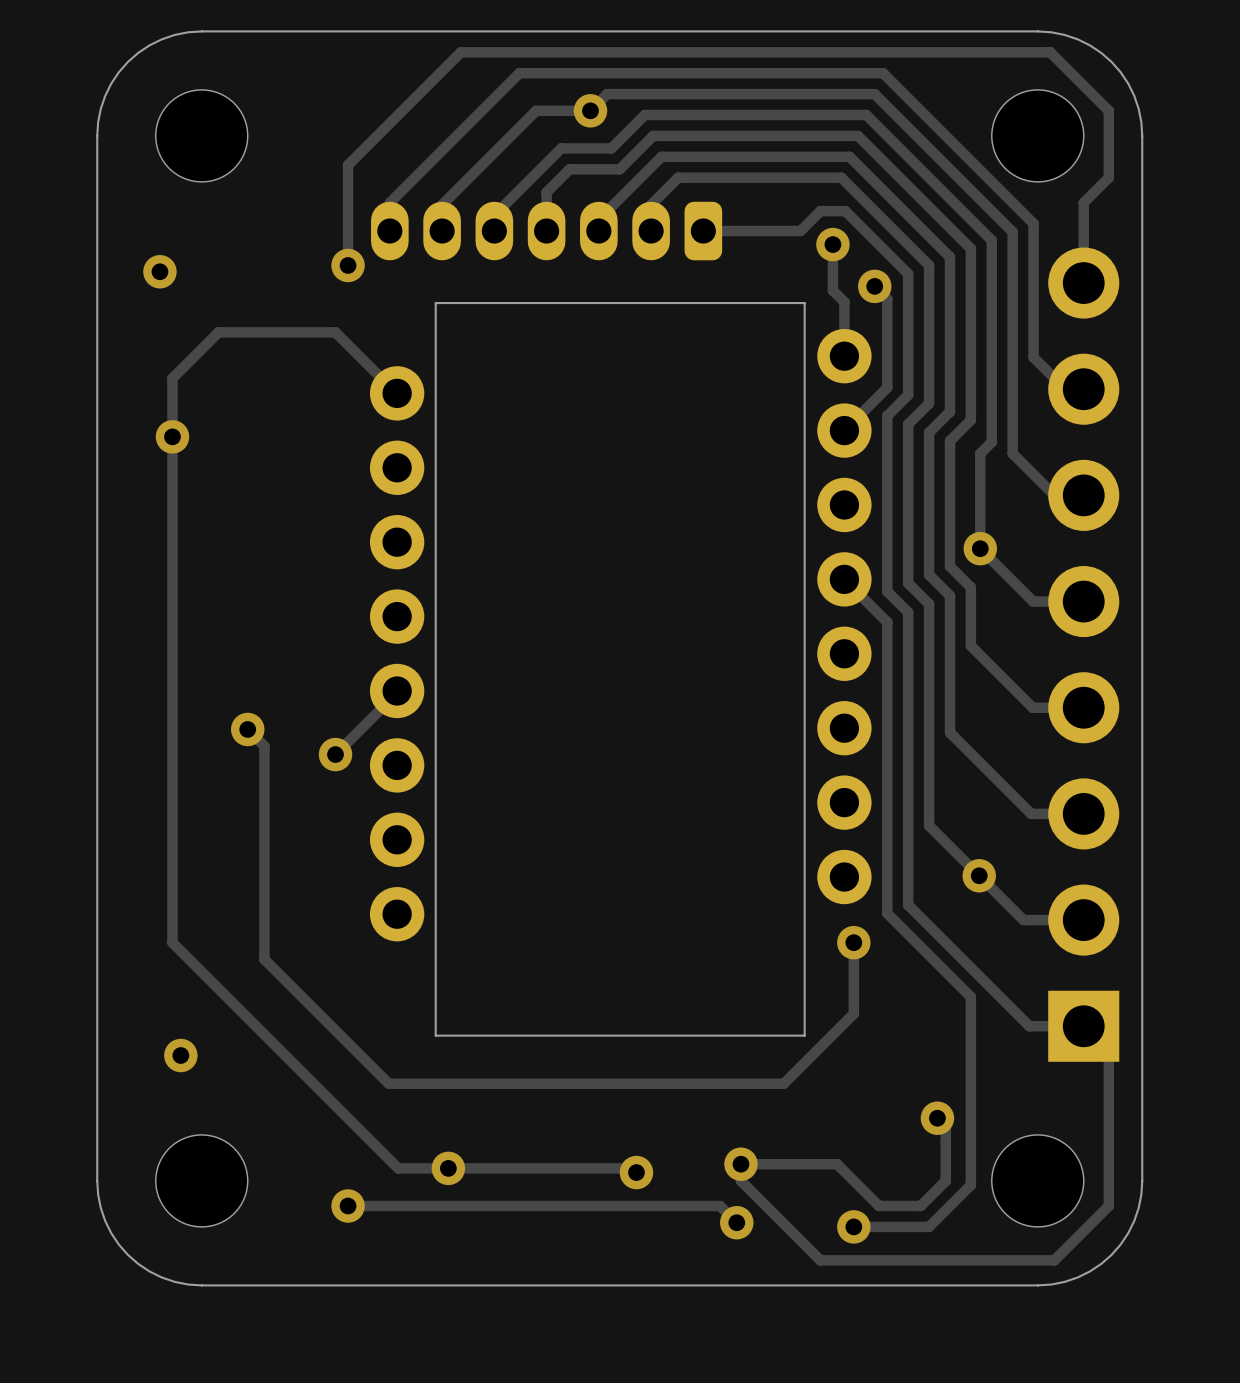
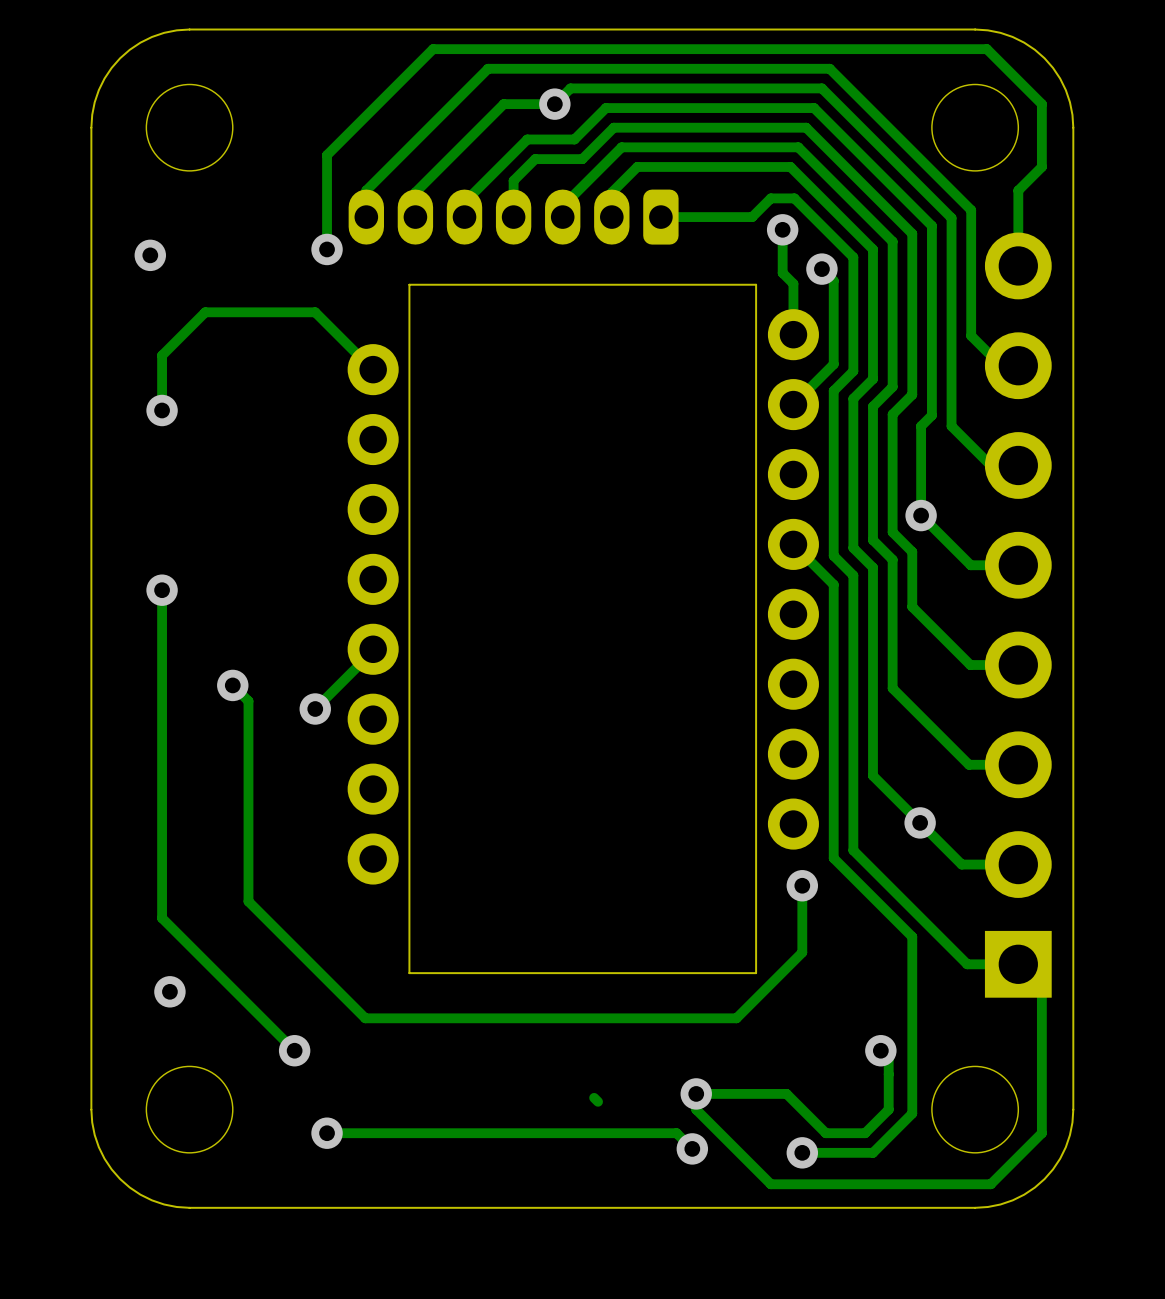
track: (172, 436) (172, 628) -> none
via: none -> (162, 590)
track: (172, 942) (398, 1168) (632, 1168) -> (162, 885) (162, 918) (294, 1050)
via position: (448, 1168) -> (294, 1050)
via: (636, 1172) -> none

